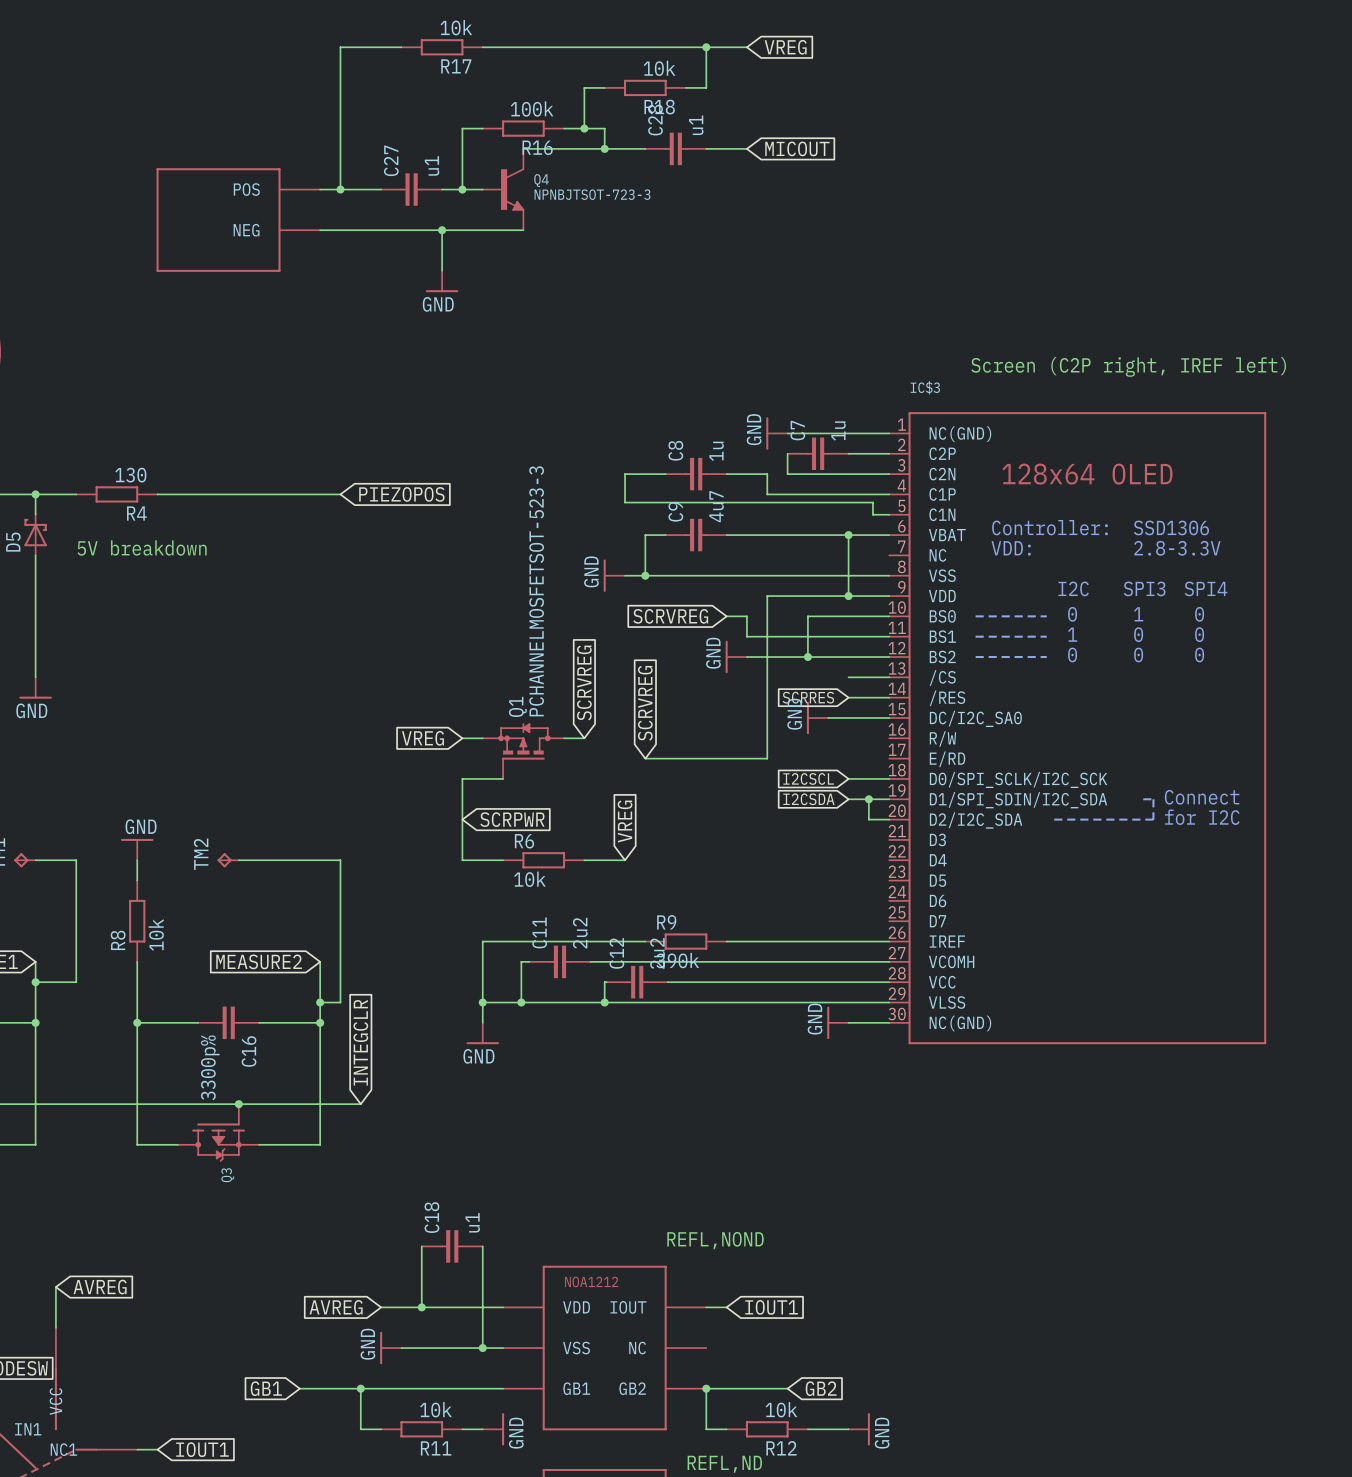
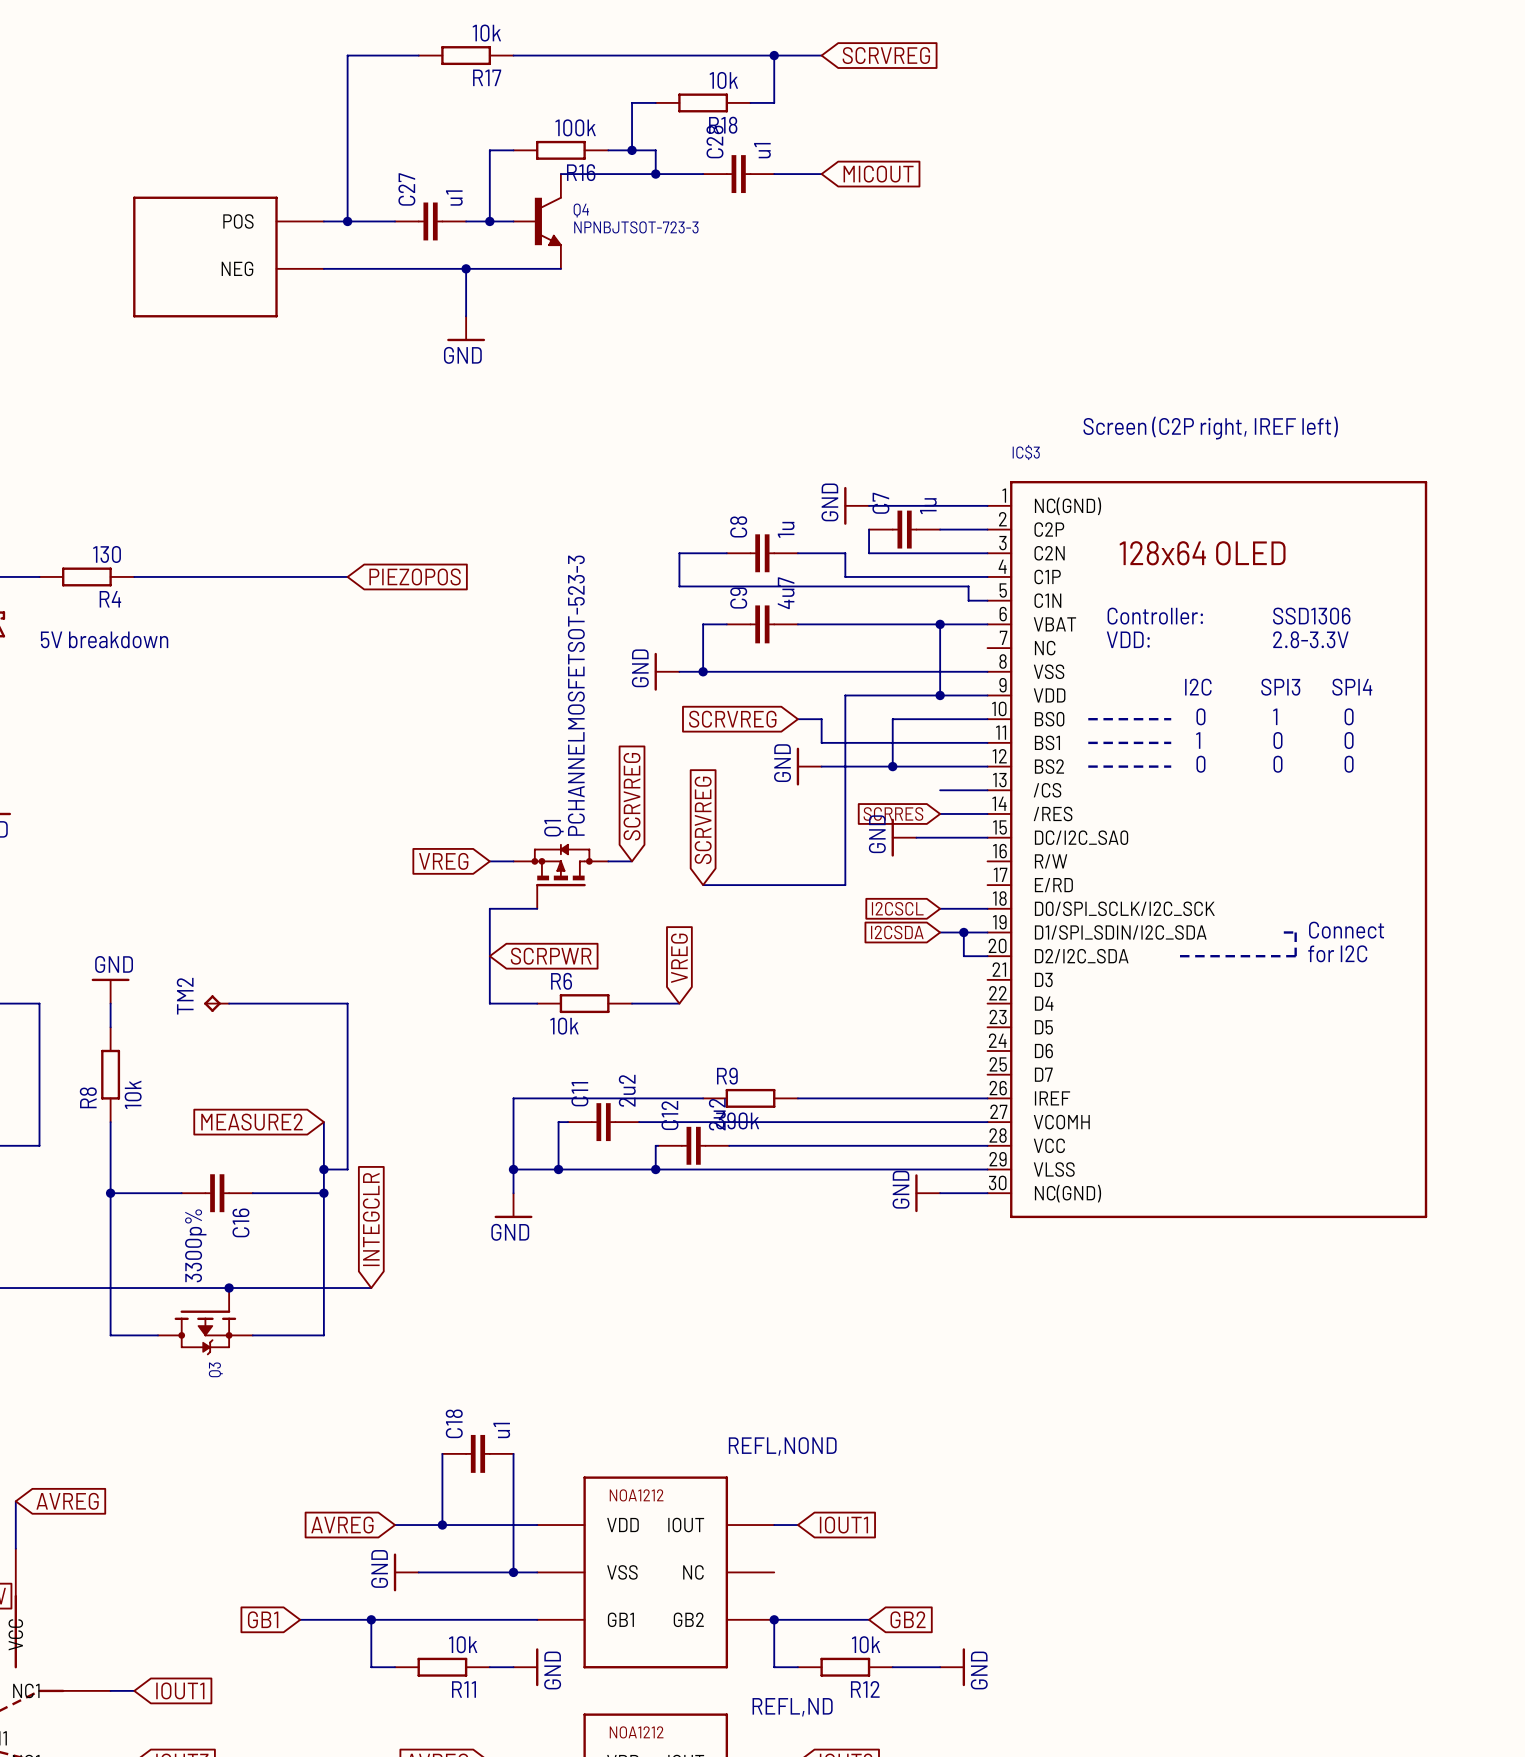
global label: VREG (785, 47) -> SCRVREG (886, 55)

